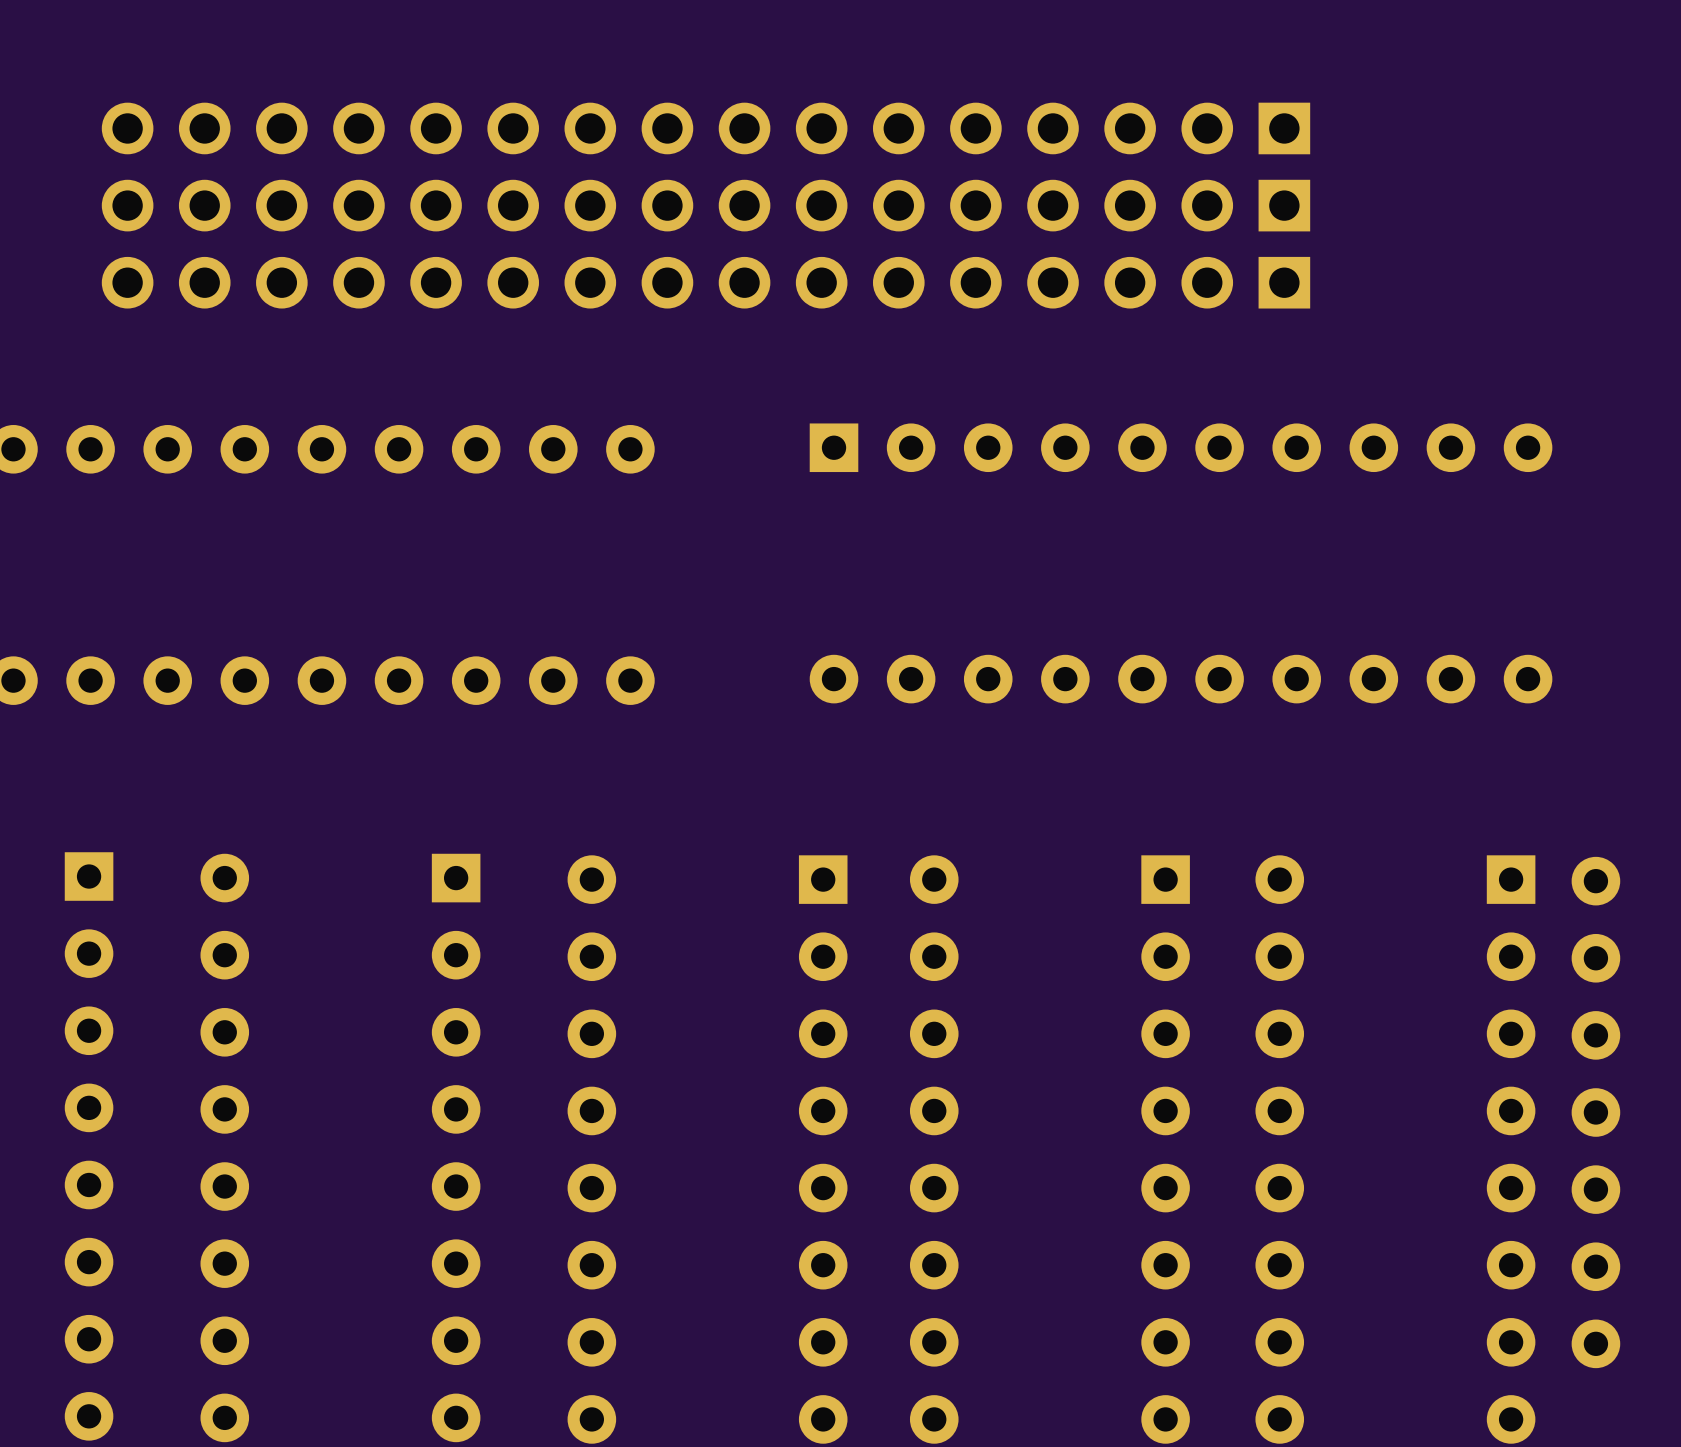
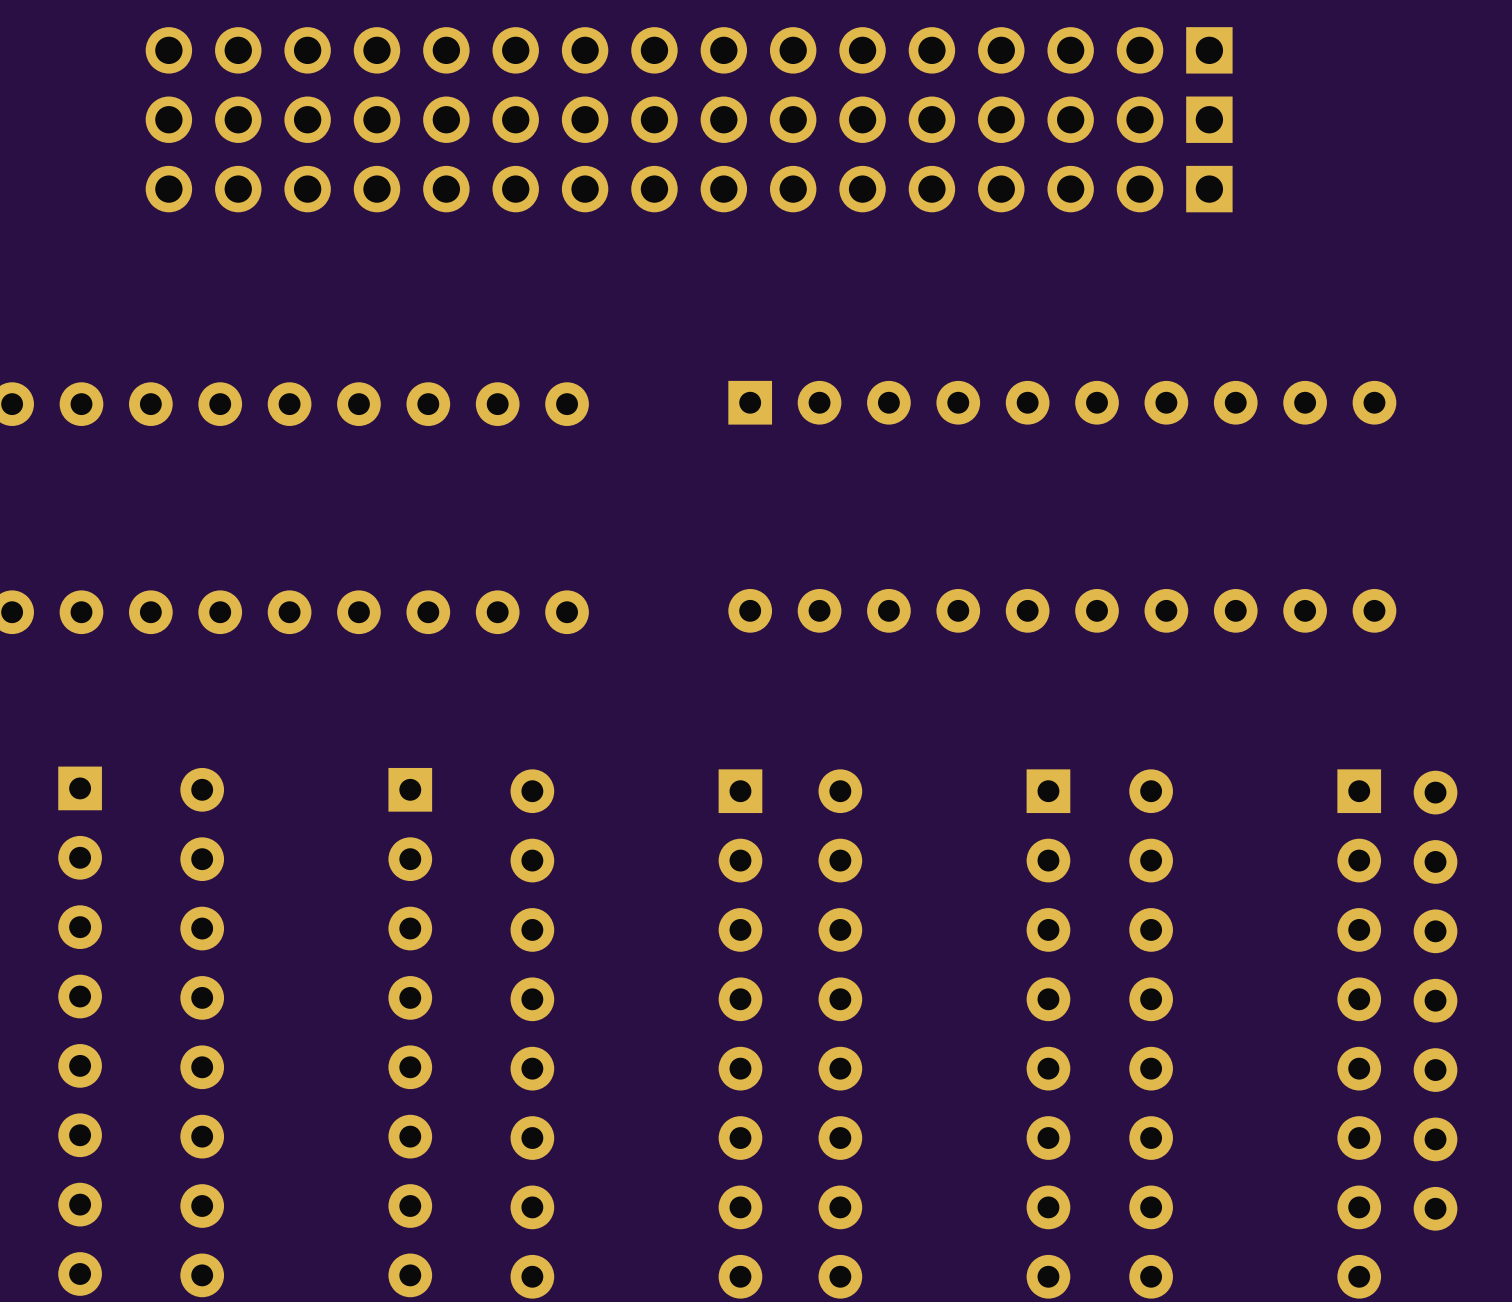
part: none -> (689, 50)
part: (705, 128) -> none
part: none -> (689, 119)
part: (705, 205) -> none
part: none -> (689, 189)
part: (705, 282) -> none

